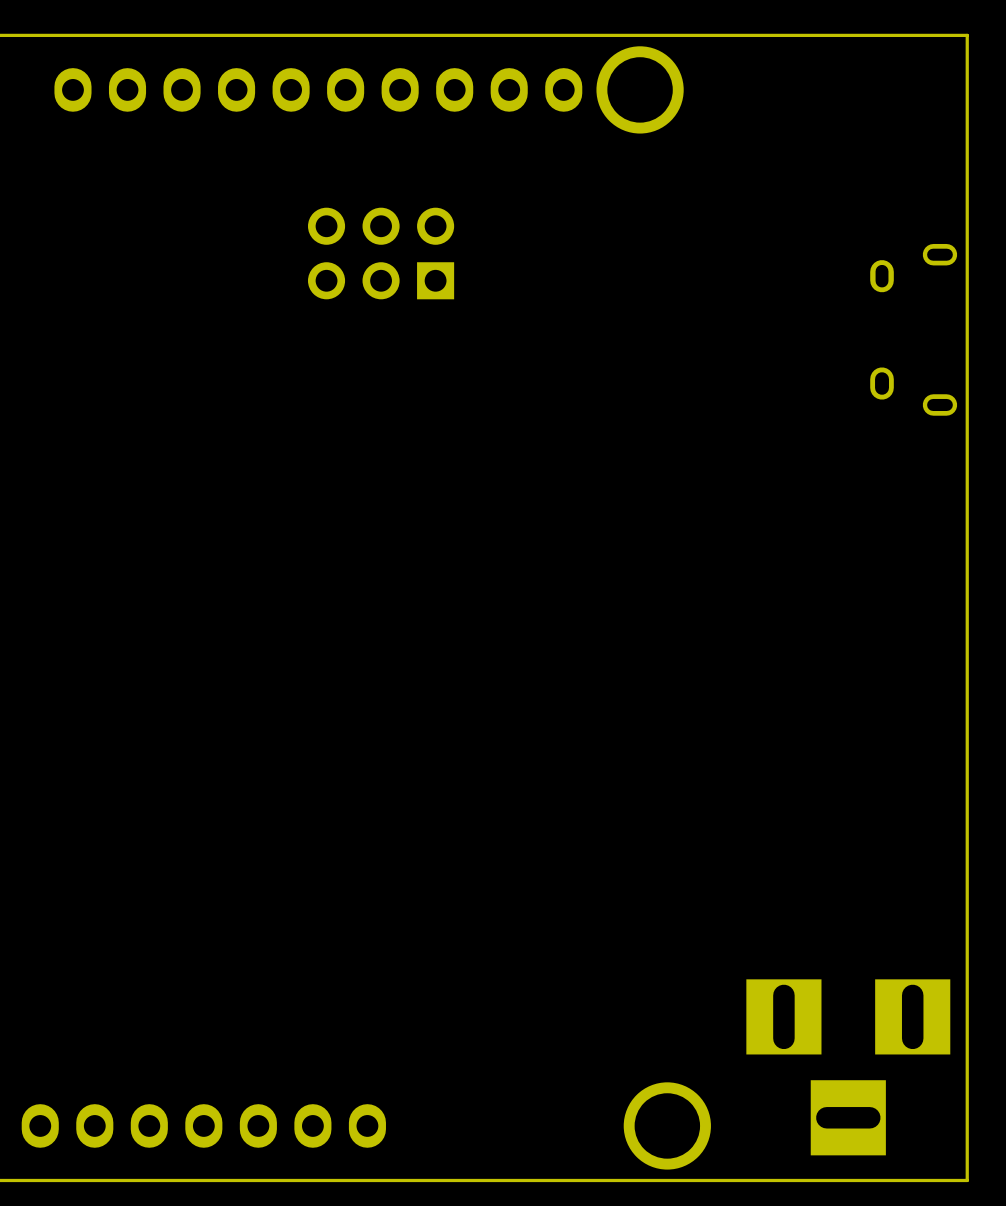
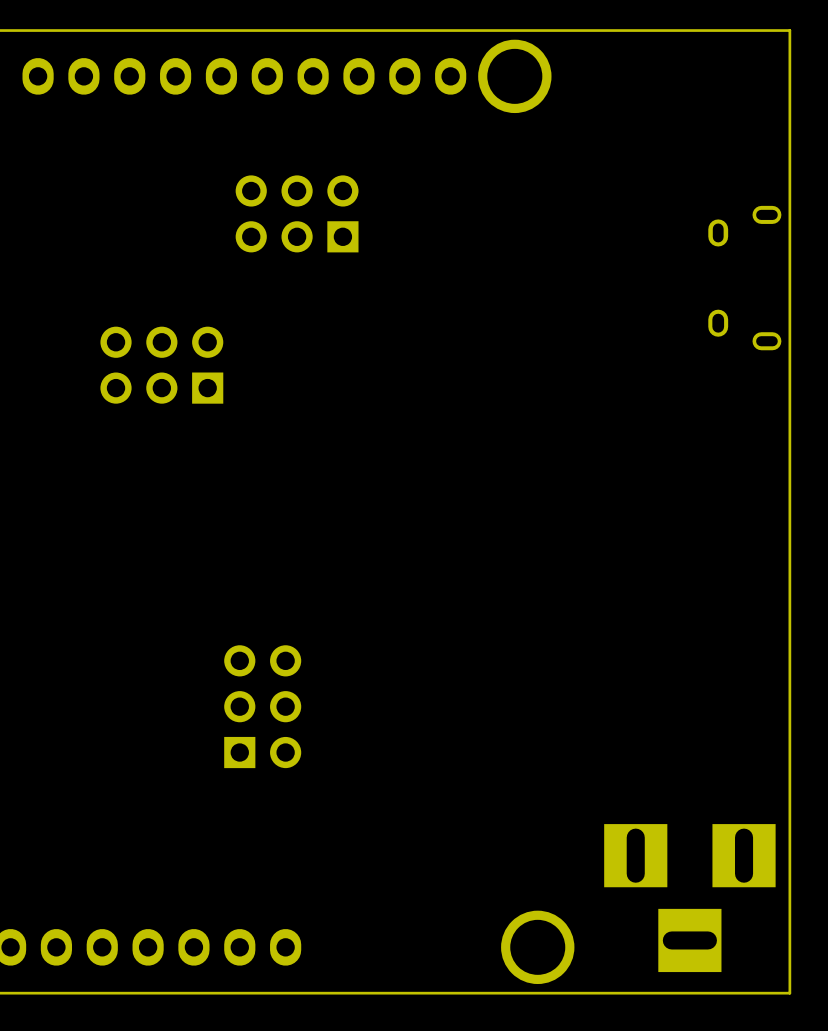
part: none -> (161, 365)
part: none -> (262, 706)

